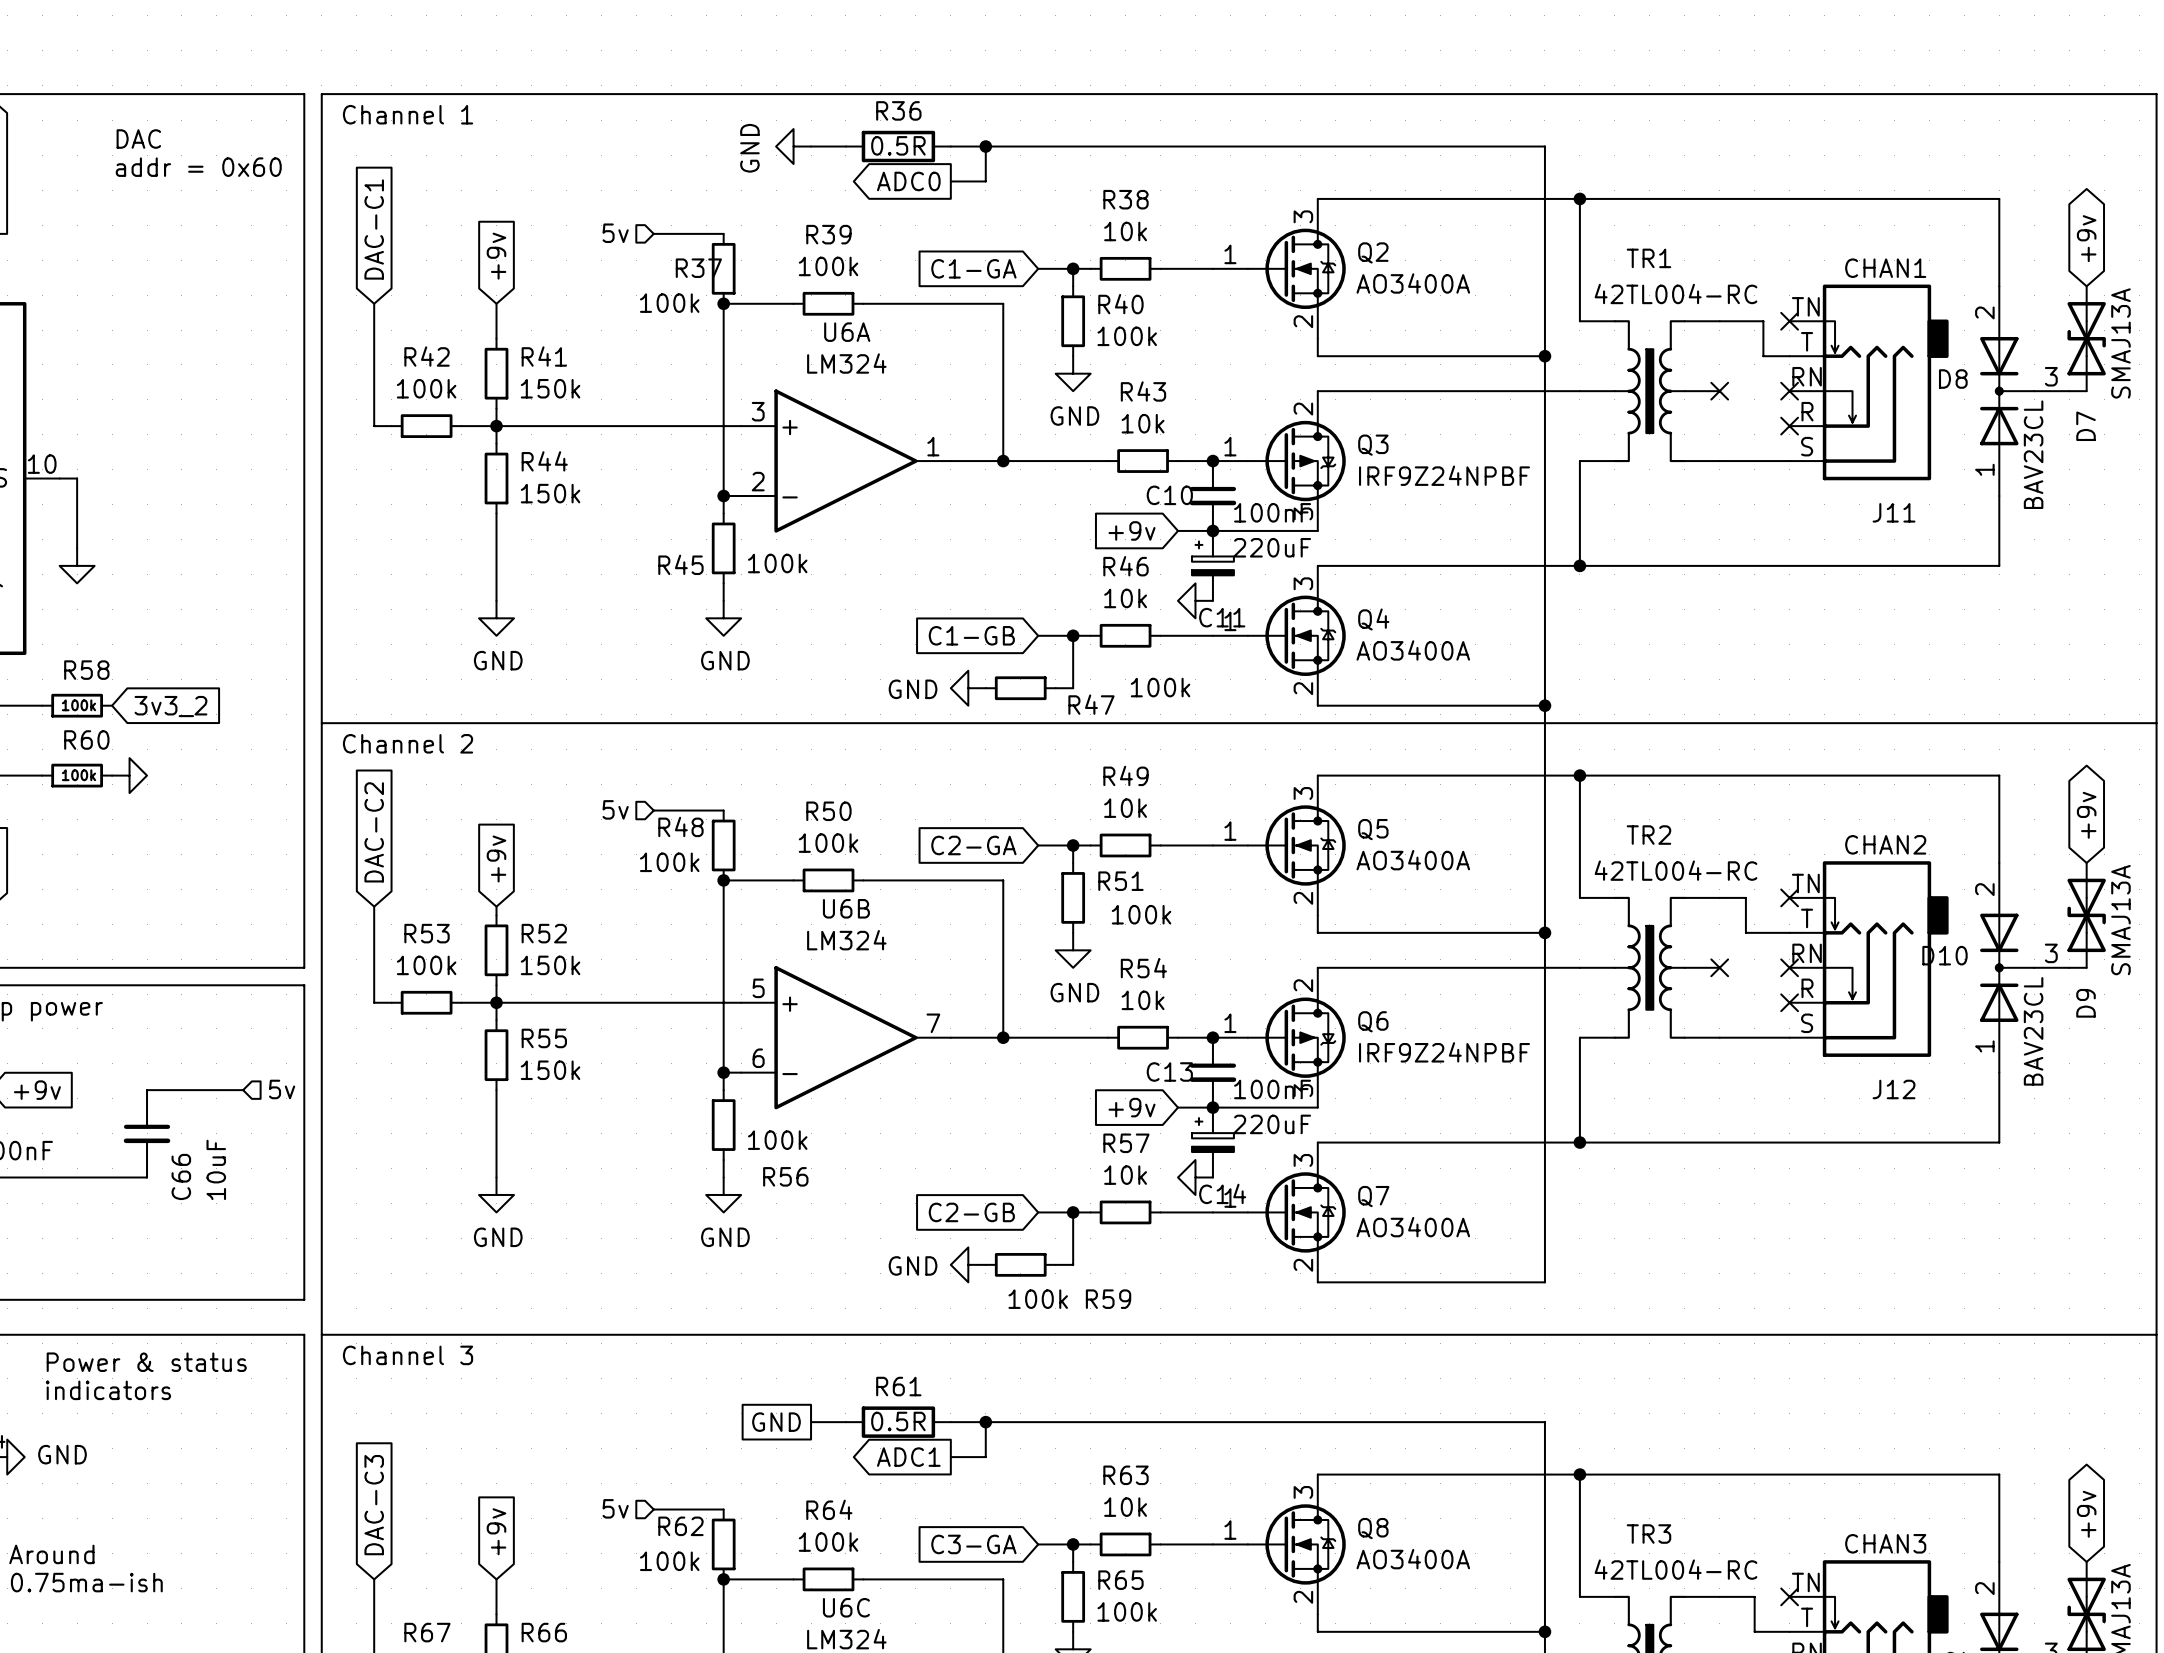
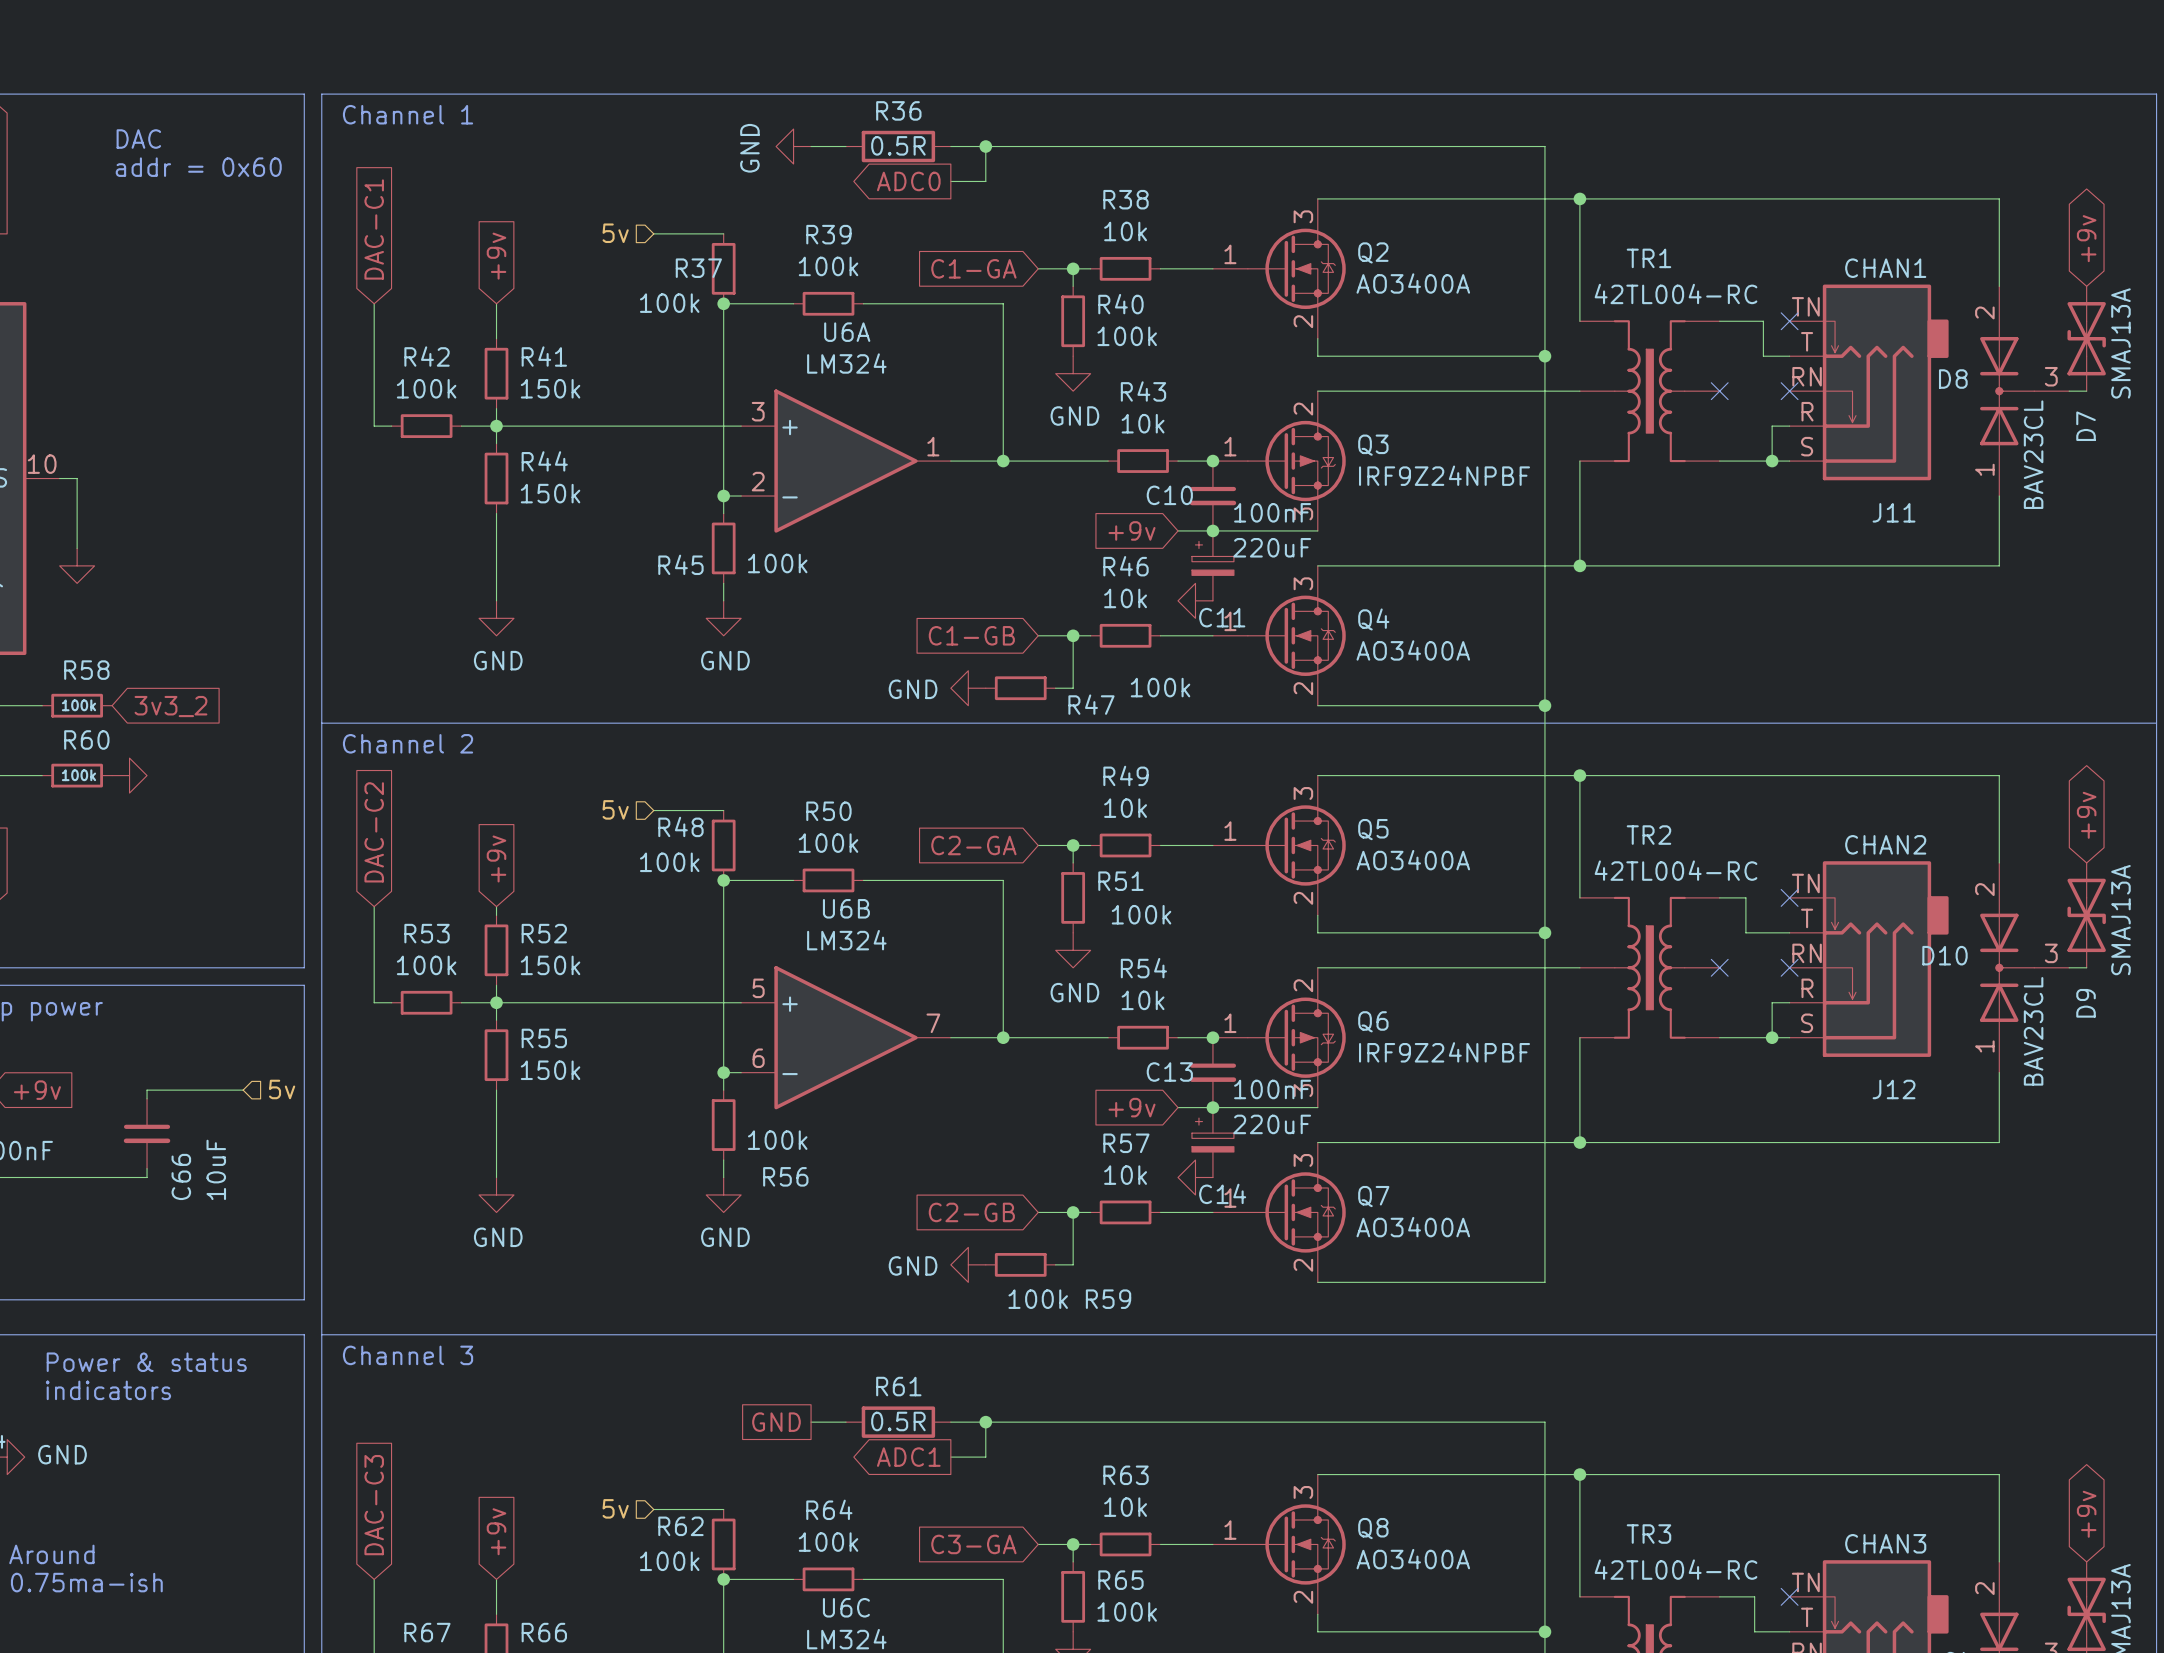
wire: none -> (1789, 426) (1772, 426) (1772, 461)
no-connect mark: (1789, 426) -> none
junction: none -> (1772, 461)
wire: none -> (1789, 1002) (1772, 1002) (1772, 1037)
no-connect mark: (1789, 1002) -> none
junction: none -> (1772, 1037)

